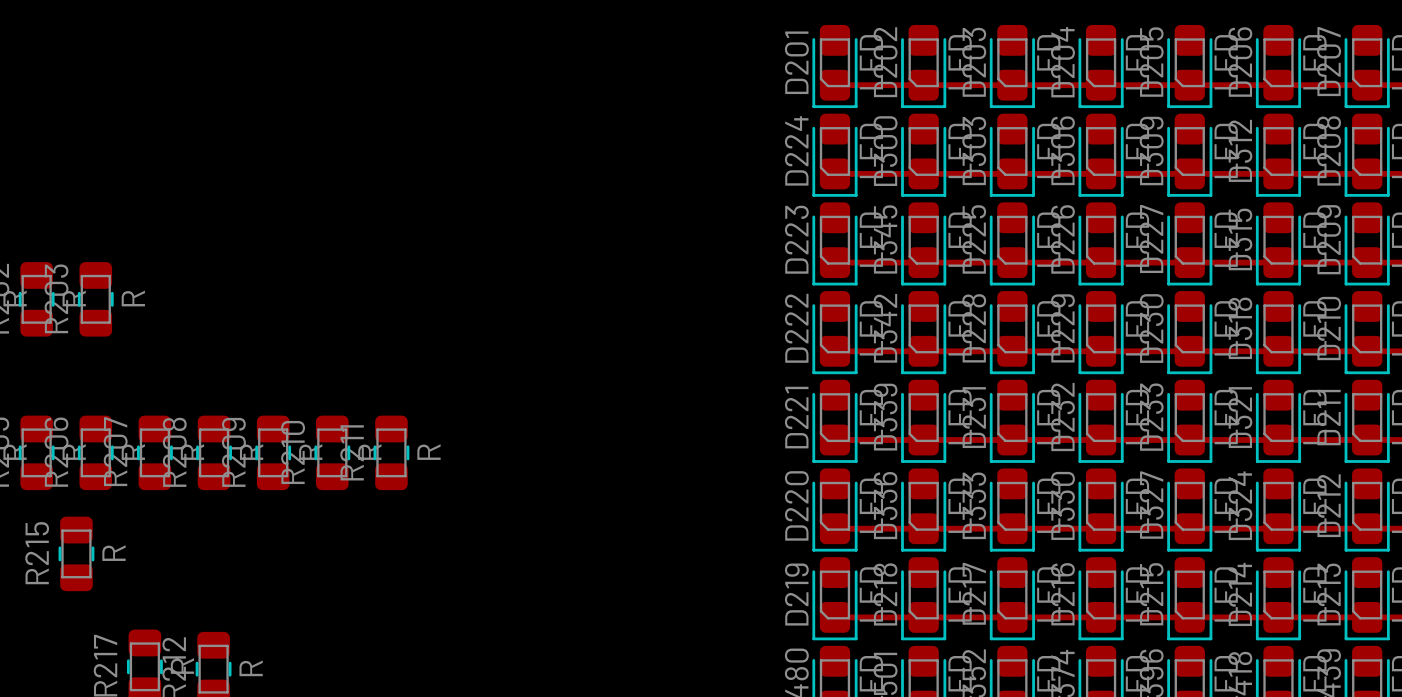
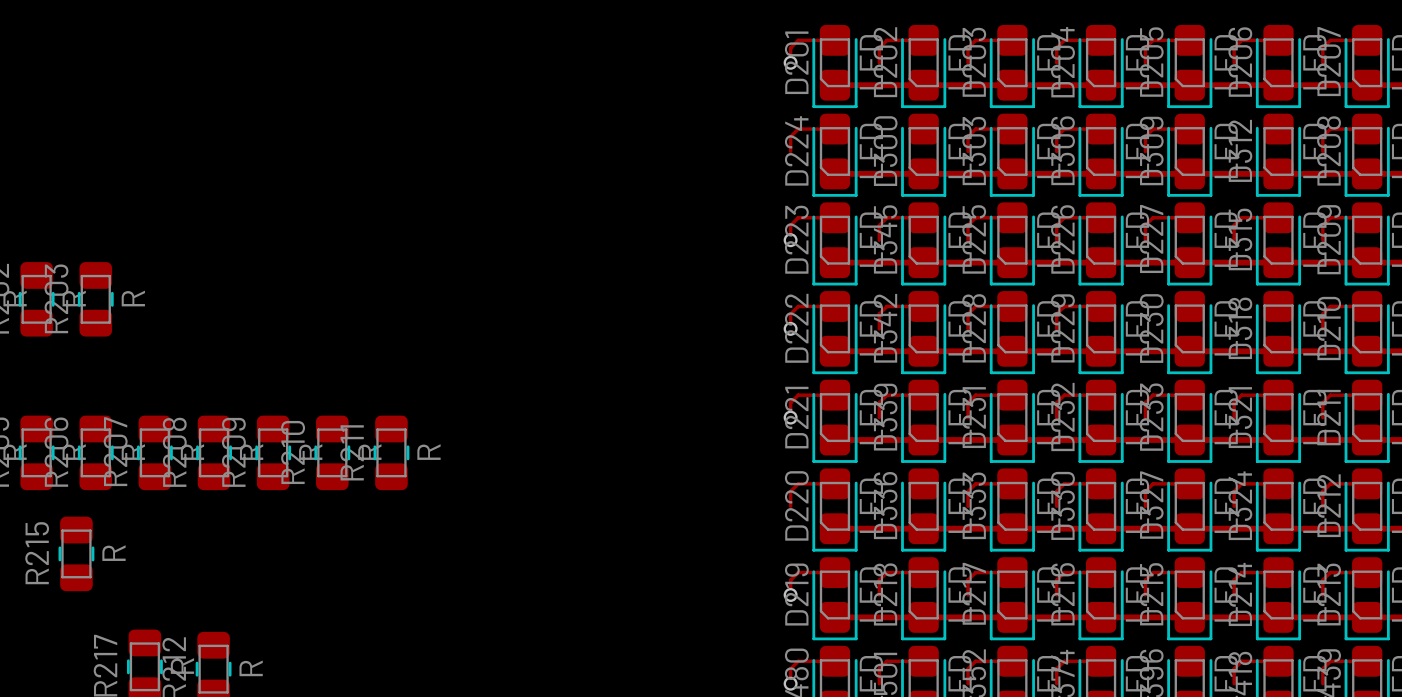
track: none -> (834, 40) (798, 40) (790, 48) (790, 62)
track: none -> (923, 40) (886, 40) (879, 48) (879, 62)
track: none -> (1012, 40) (975, 40) (968, 48) (968, 62)
track: none -> (1101, 40) (1064, 40) (1056, 48) (1056, 62)
track: none -> (1189, 40) (1153, 40) (1145, 48) (1145, 62)
track: none -> (1278, 40) (1241, 40) (1234, 48) (1234, 62)
track: none -> (1367, 40) (1330, 40) (1322, 48) (1322, 62)
via: none -> (790, 62)
track: none -> (834, 129) (798, 129) (790, 136) (790, 151)
track: none -> (1012, 129) (975, 129) (968, 136) (968, 151)
track: none -> (1101, 129) (1064, 129) (1056, 136) (1056, 151)
track: none -> (1189, 129) (1153, 129) (1145, 136) (1145, 151)
track: none -> (1367, 129) (1330, 129) (1322, 136) (1322, 151)
track: none -> (834, 217) (798, 217) (790, 225) (790, 240)
track: none -> (923, 217) (886, 217) (879, 225) (879, 240)
track: none -> (1012, 217) (975, 217) (968, 225) (968, 240)
track: none -> (1101, 217) (1064, 217) (1056, 225) (1056, 240)
track: none -> (1189, 217) (1153, 217) (1145, 225) (1145, 240)
track: none -> (1278, 217) (1241, 217) (1234, 225) (1234, 240)
track: none -> (1367, 217) (1330, 217) (1322, 225) (1322, 240)
via: none -> (790, 240)
track: none -> (834, 306) (798, 306) (790, 314) (790, 328)
track: none -> (923, 306) (886, 306) (879, 314) (879, 328)
track: none -> (1012, 306) (975, 306) (968, 314) (968, 328)
track: none -> (1101, 306) (1064, 306) (1056, 314) (1056, 328)
track: none -> (1367, 306) (1330, 306) (1322, 314) (1322, 328)
via: none -> (790, 328)
track: none -> (834, 395) (798, 395) (790, 402) (790, 417)
track: none -> (923, 395) (886, 395) (879, 402) (879, 417)
track: none -> (1012, 395) (975, 395) (968, 402) (968, 417)
track: none -> (1101, 395) (1064, 395) (1056, 402) (1056, 417)
track: none -> (1189, 395) (1153, 395) (1145, 402) (1145, 417)
track: none -> (1278, 395) (1241, 395) (1234, 402) (1234, 417)
track: none -> (1367, 395) (1330, 395) (1322, 402) (1322, 417)
via: none -> (790, 417)
track: none -> (834, 483) (798, 483) (790, 491) (790, 506)
track: none -> (1012, 483) (975, 483) (968, 491) (968, 506)
track: none -> (1101, 483) (1064, 483) (1056, 491) (1056, 506)
track: none -> (1189, 483) (1153, 483) (1145, 491) (1145, 506)
track: none -> (1278, 483) (1241, 483) (1234, 491) (1234, 506)
track: none -> (1367, 483) (1330, 483) (1322, 491) (1322, 506)
track: none -> (834, 572) (798, 572) (790, 580) (790, 595)
track: none -> (923, 572) (886, 572) (879, 580) (879, 595)
track: none -> (1012, 572) (975, 572) (968, 580) (968, 595)
track: none -> (1101, 572) (1064, 572) (1056, 580) (1056, 595)
track: none -> (1189, 572) (1153, 572) (1145, 580) (1145, 595)
track: none -> (1278, 572) (1241, 572) (1234, 580) (1234, 595)
track: none -> (1367, 572) (1330, 572) (1322, 580) (1322, 595)
via: none -> (790, 595)
track: none -> (834, 661) (798, 661) (790, 668) (790, 683)
track: none -> (923, 661) (886, 661) (879, 668) (879, 683)
track: none -> (1012, 661) (975, 661) (968, 668) (968, 683)
track: none -> (1101, 661) (1064, 661) (1056, 668) (1056, 683)
track: none -> (1278, 661) (1241, 661) (1234, 668) (1234, 683)
track: none -> (1367, 661) (1330, 661) (1322, 668) (1322, 683)
via: none -> (790, 683)

